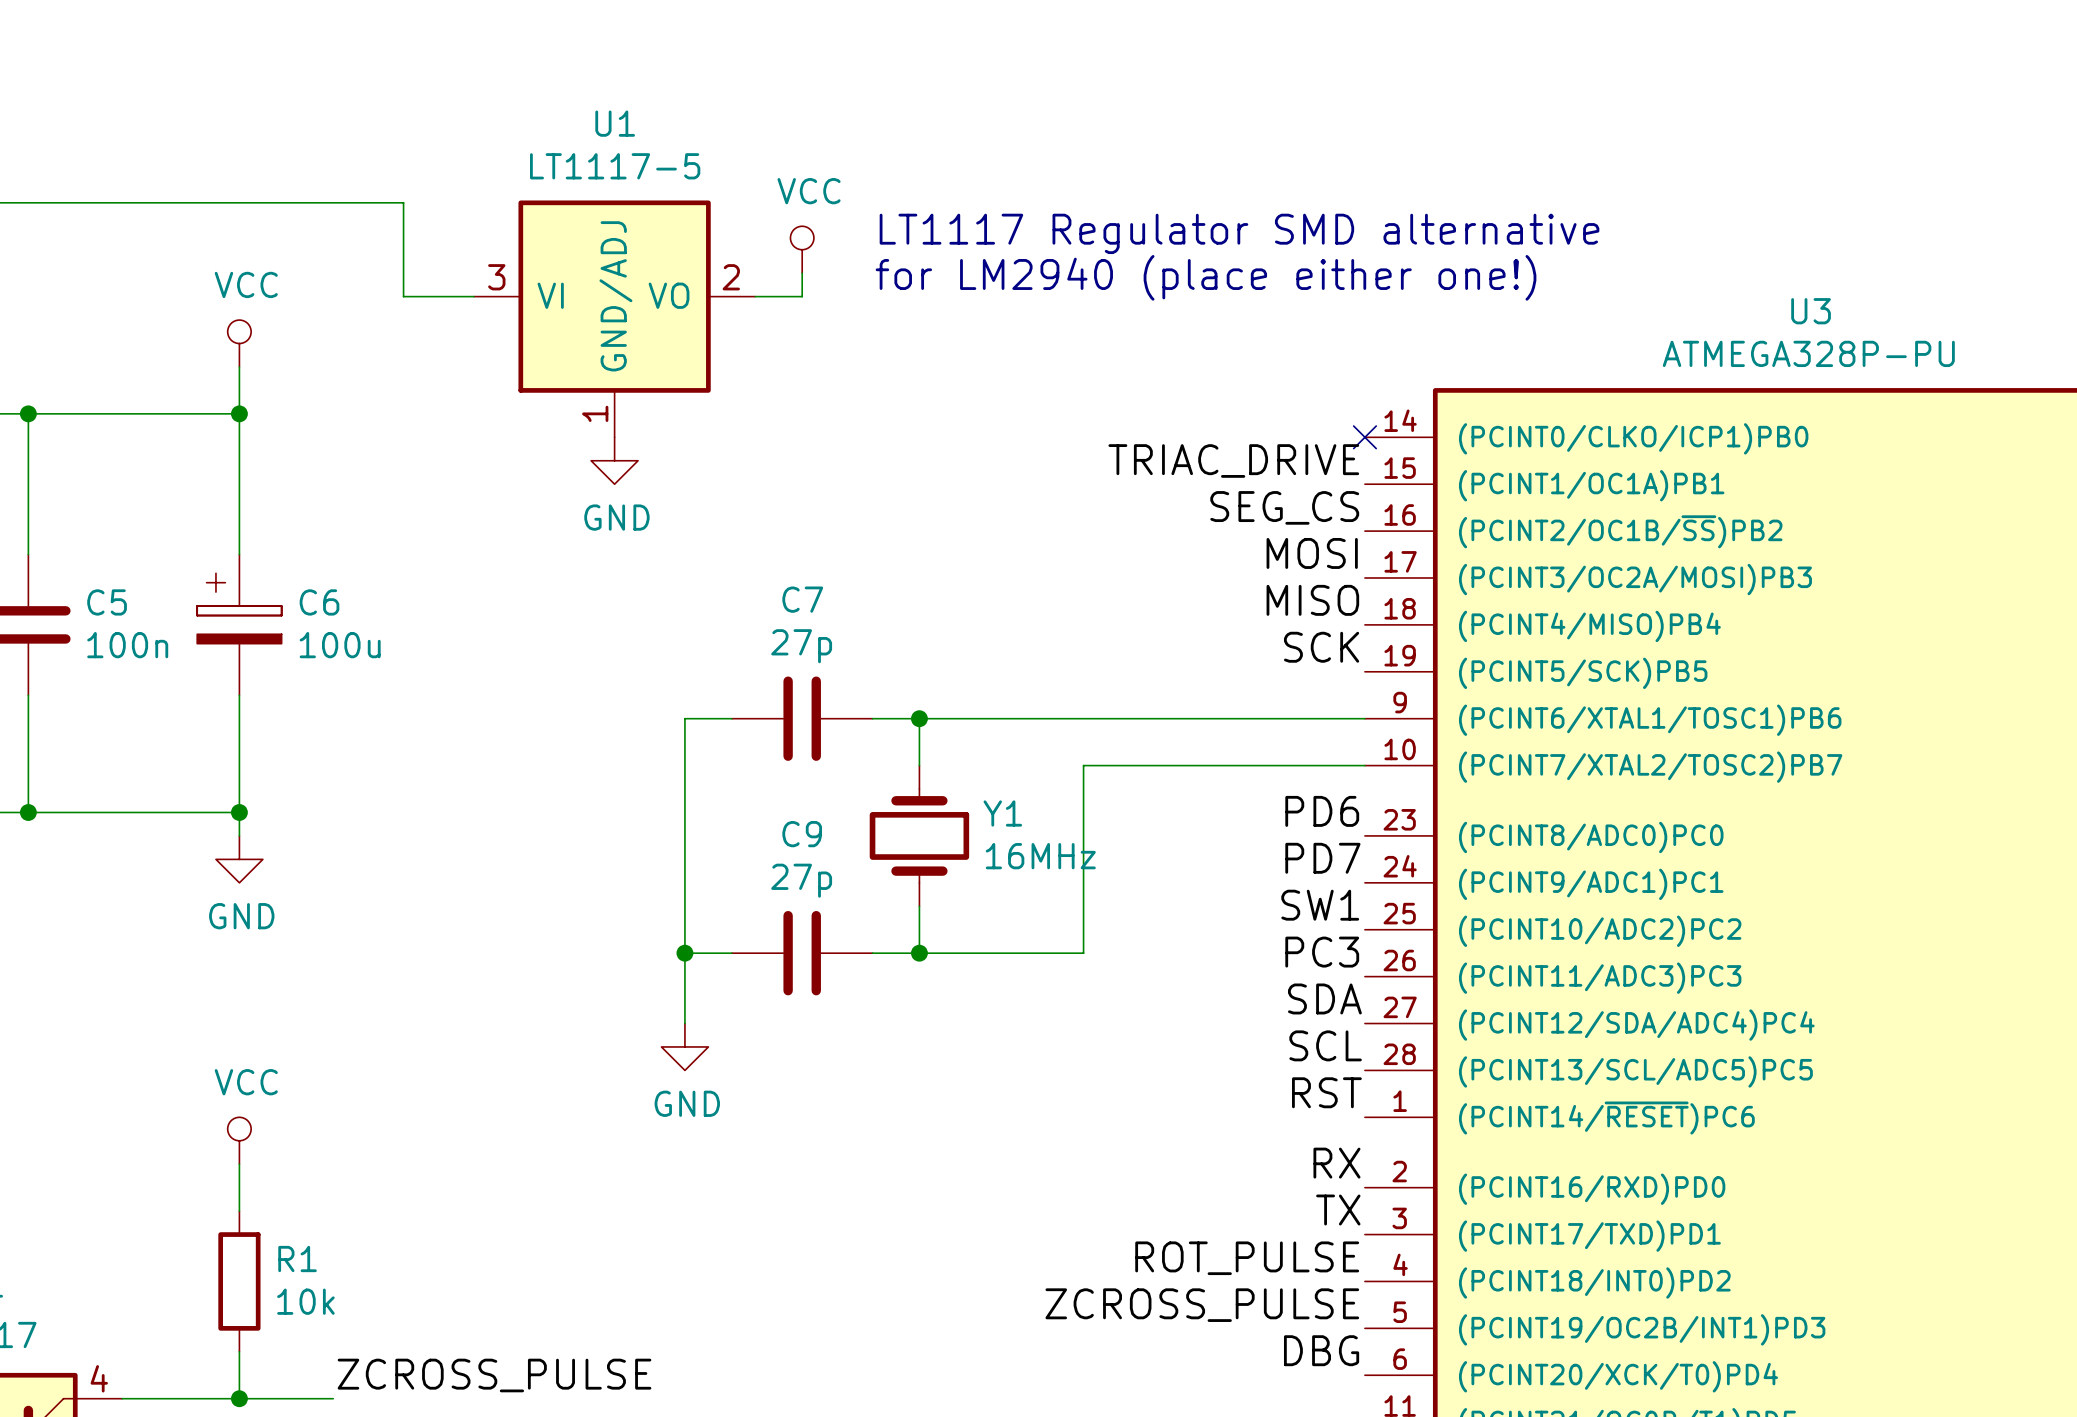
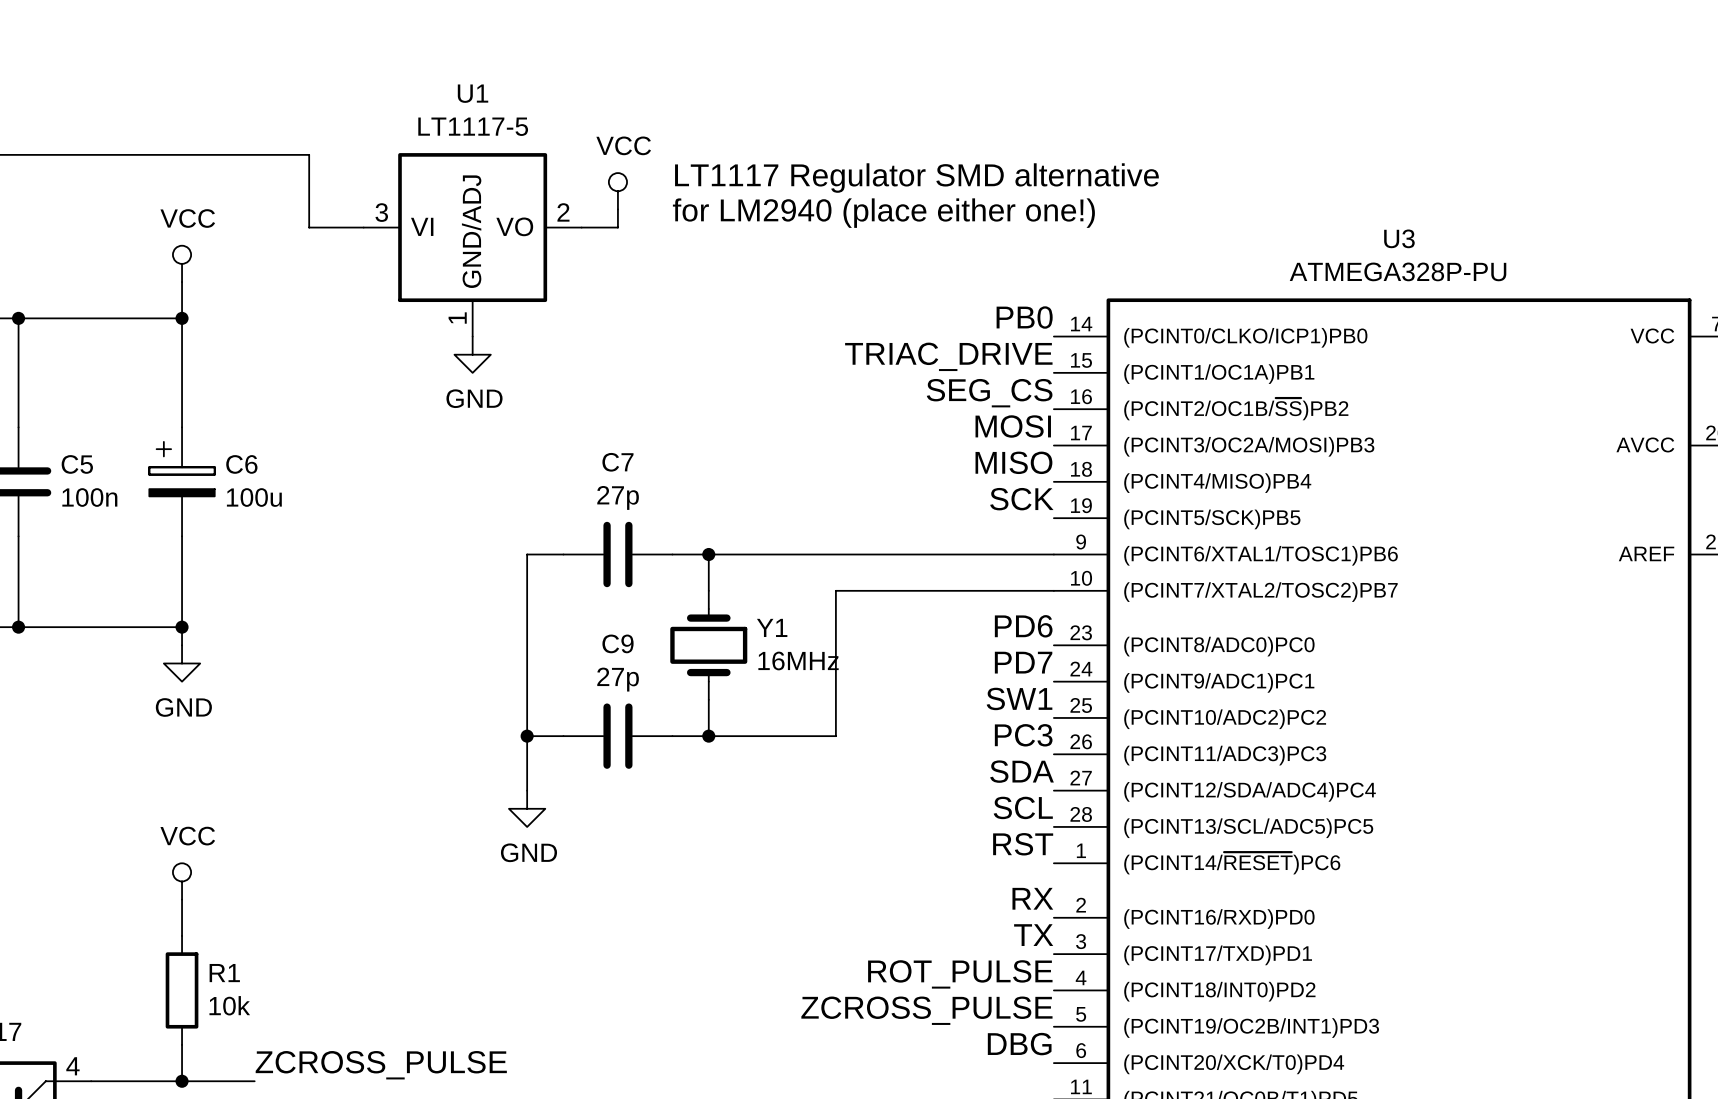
label: none -> PB0 (1024, 317)
no-connect mark: (1364, 437) -> none

